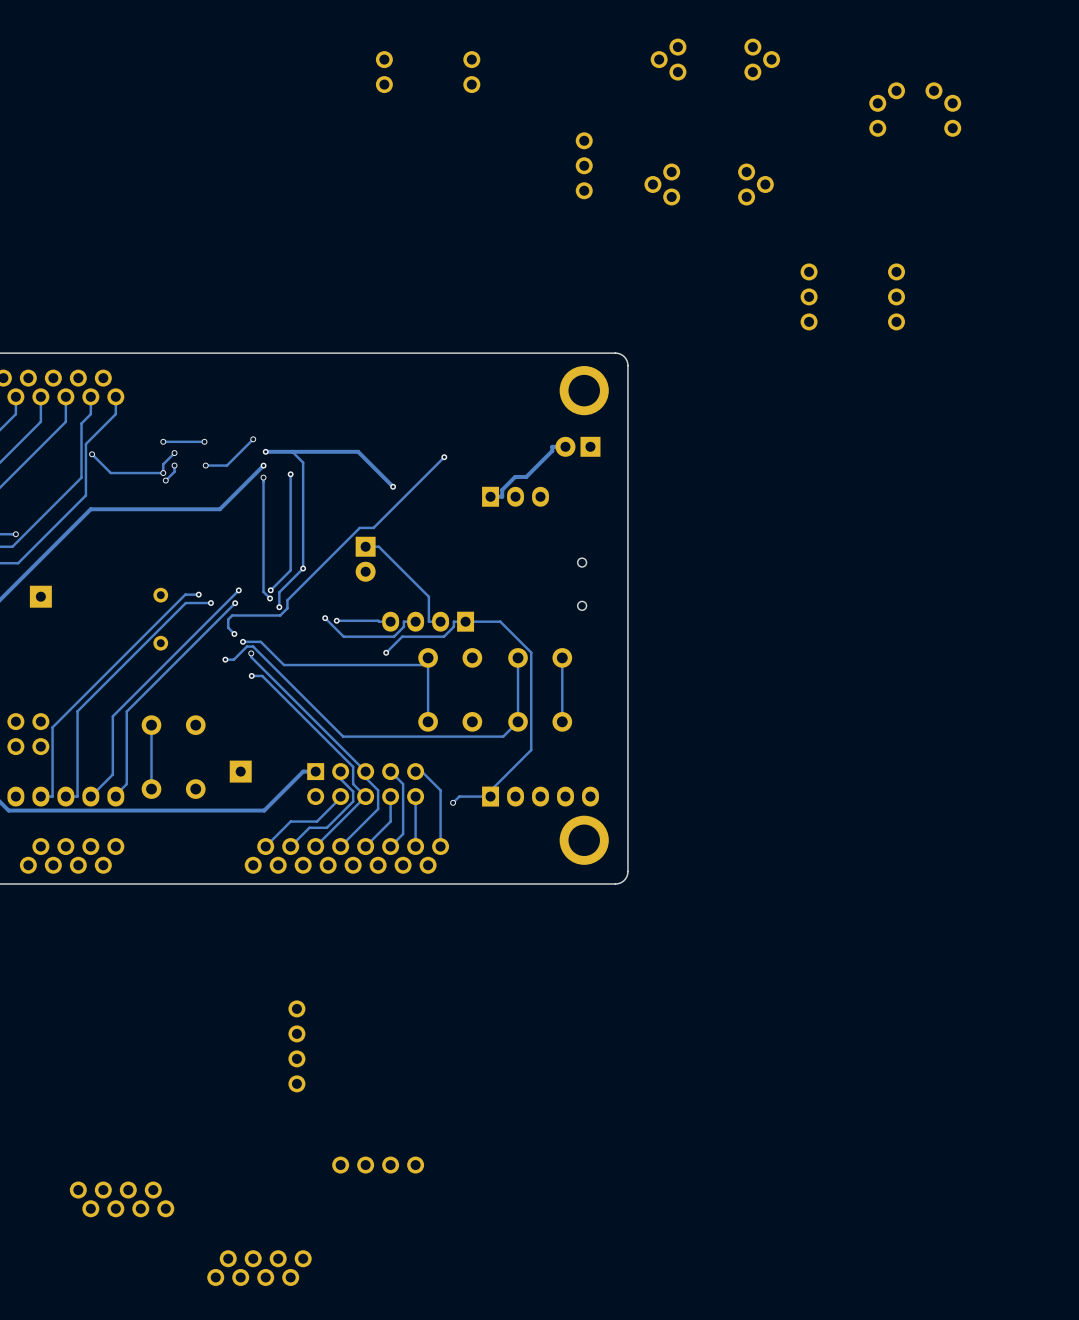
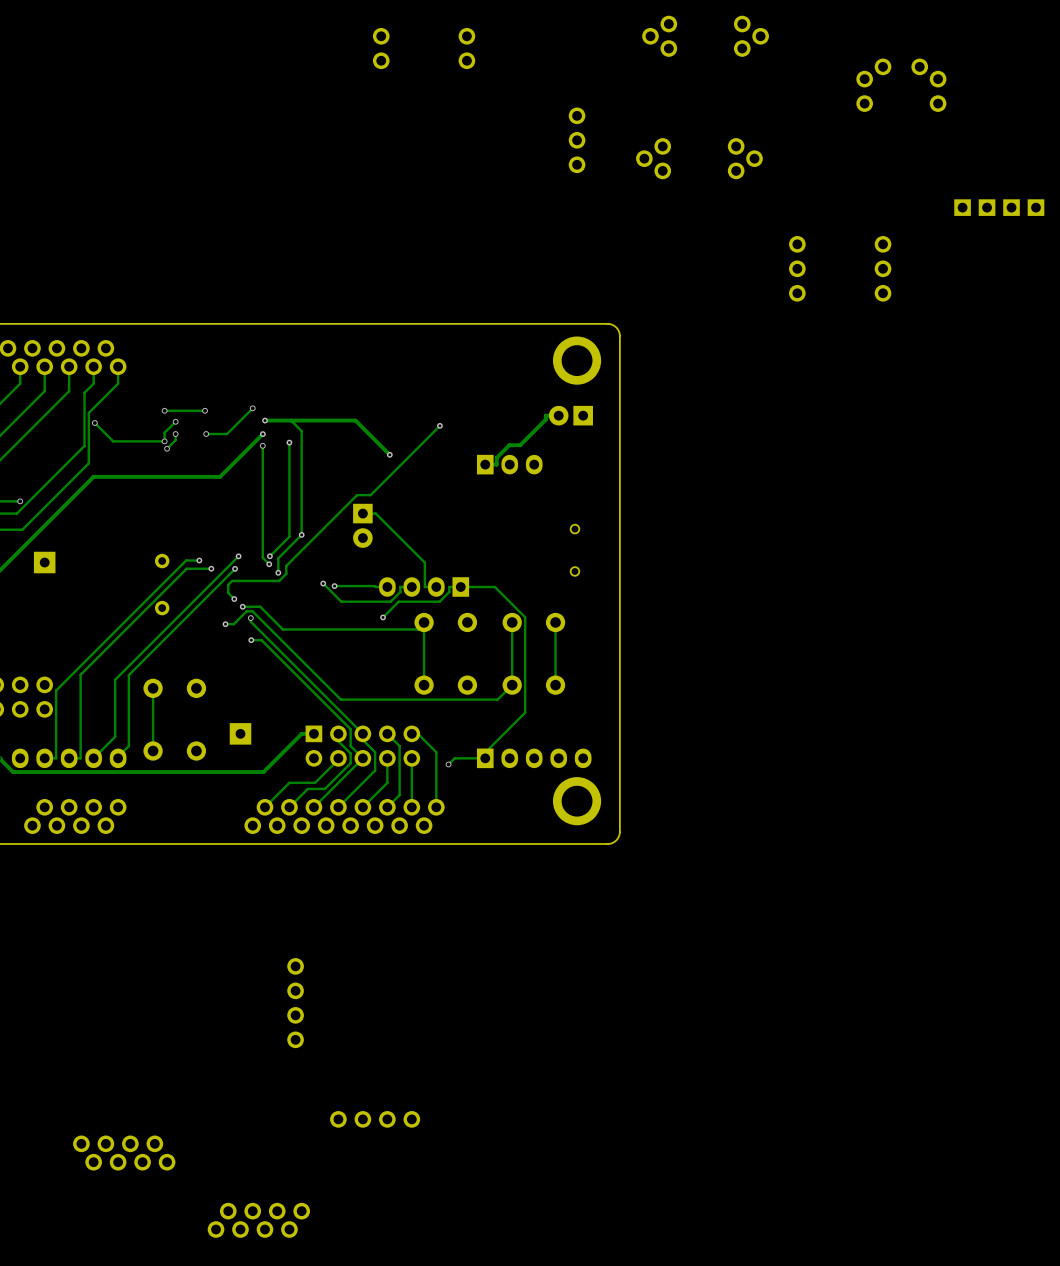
part: none -> (962, 207)
part: none -> (987, 207)
part: none -> (1011, 207)
part: none -> (1036, 207)

